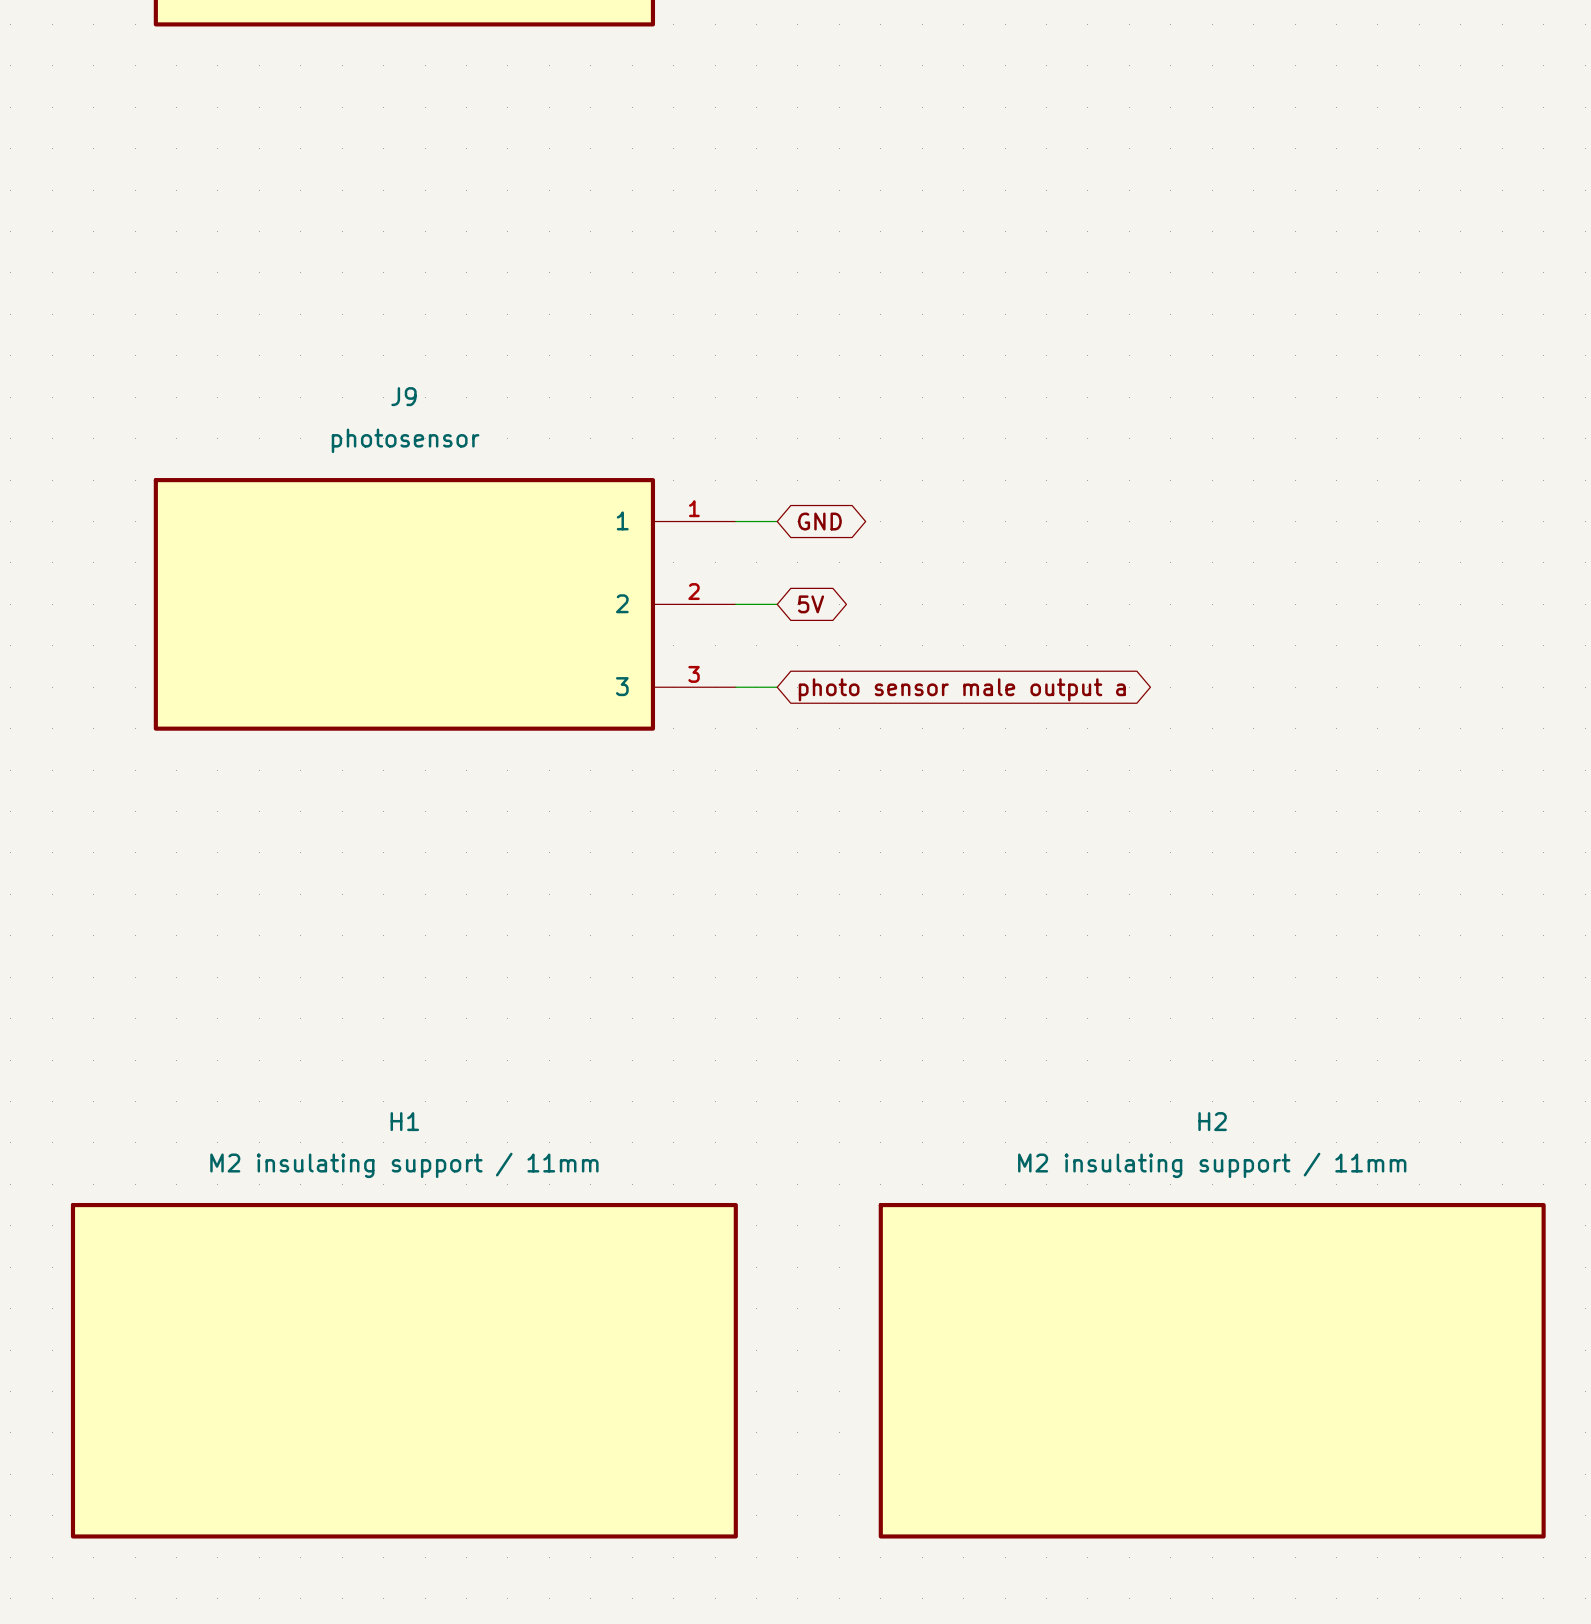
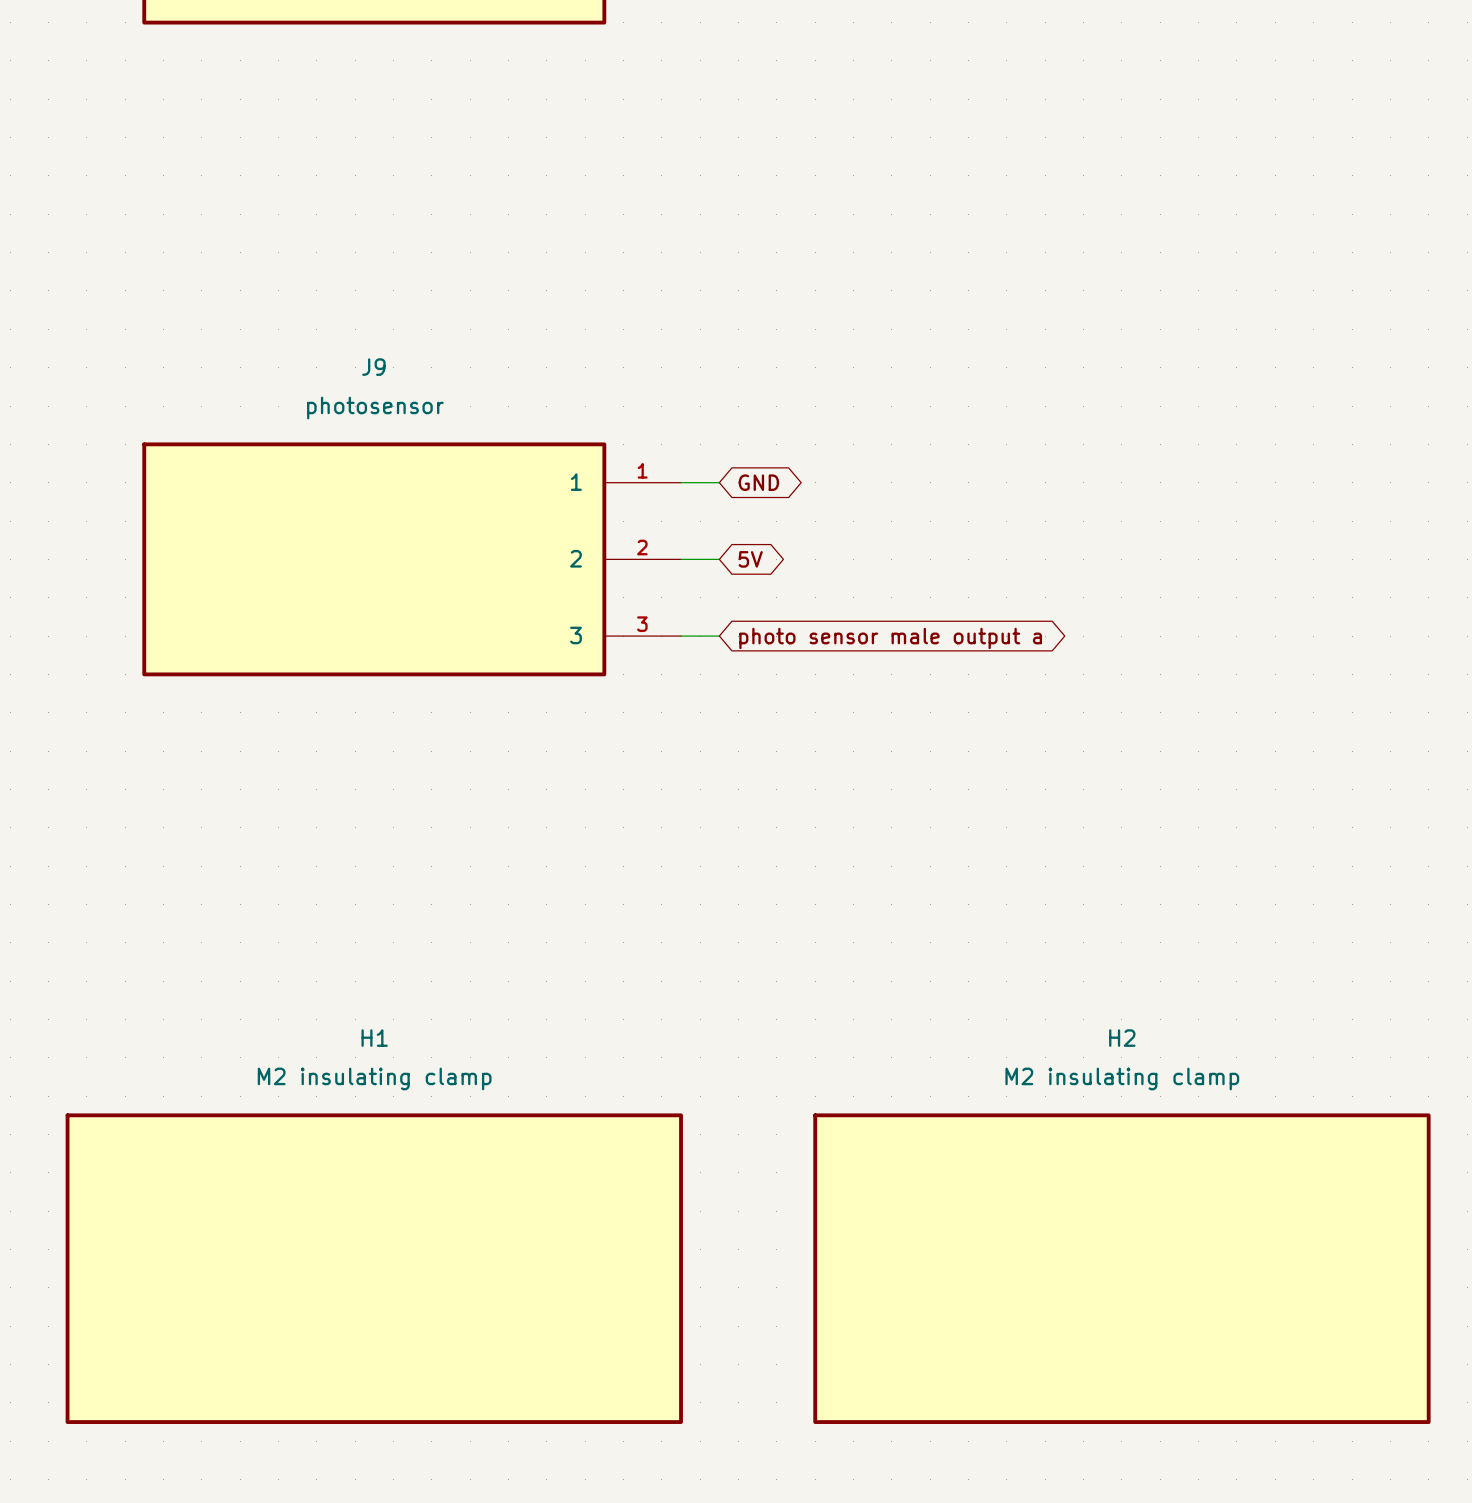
H1 value: M2 insulating support / 11mm (404, 1165) -> M2 insulating clamp (374, 1078)
H2 value: M2 insulating support / 11mm (1212, 1165) -> M2 insulating clamp (1122, 1078)

